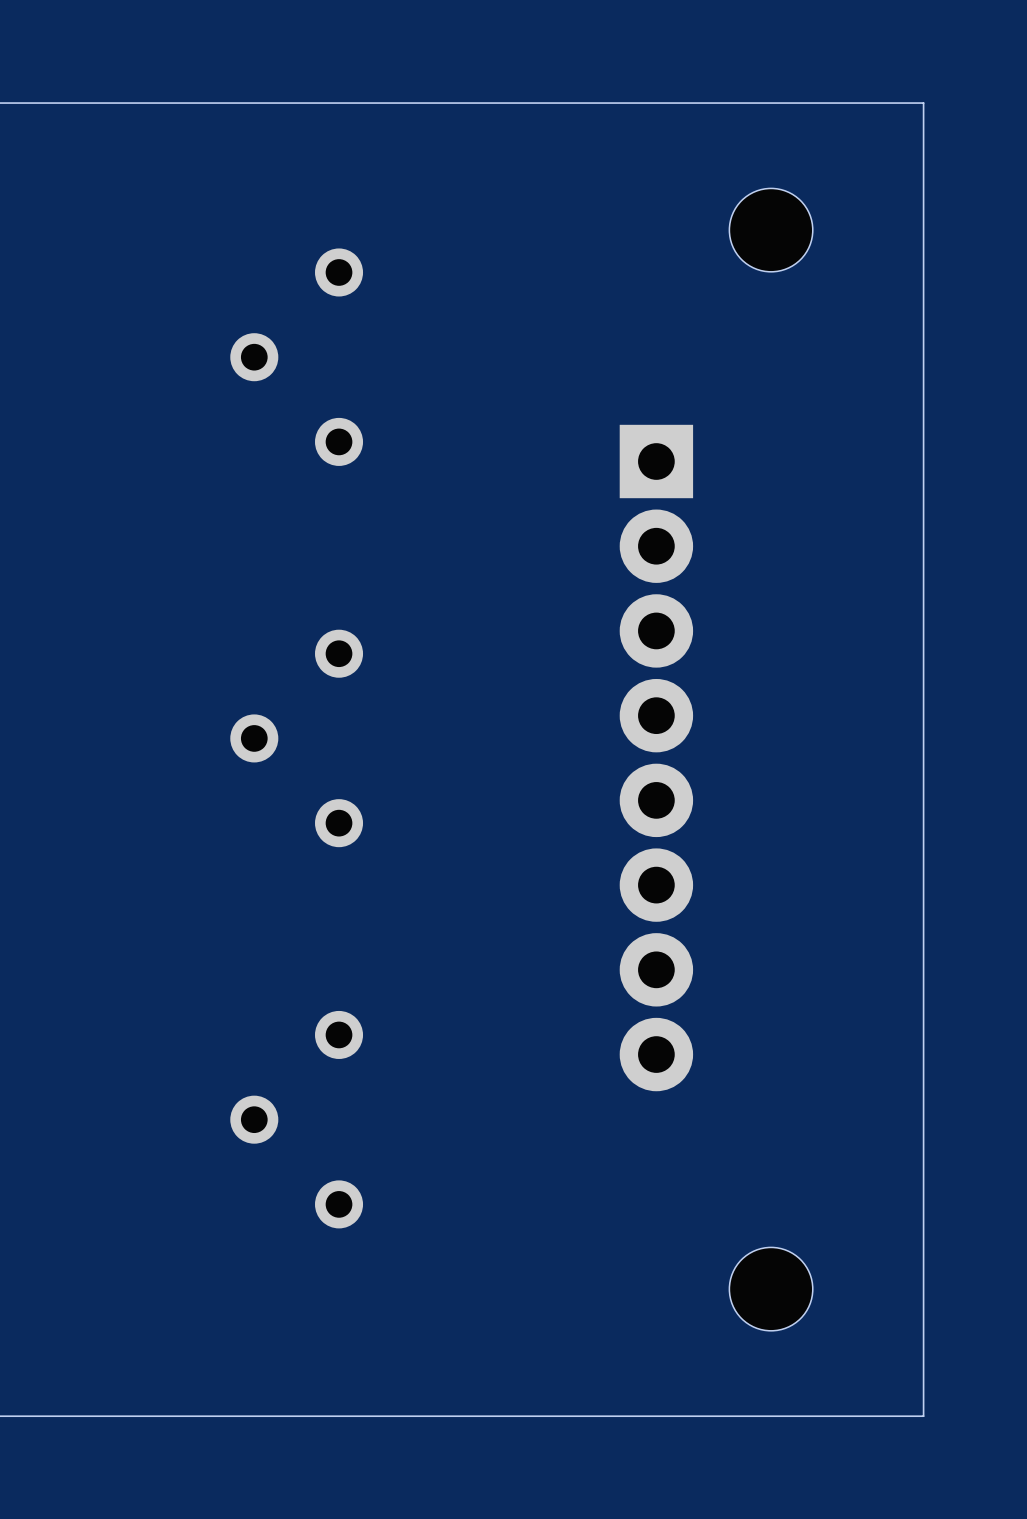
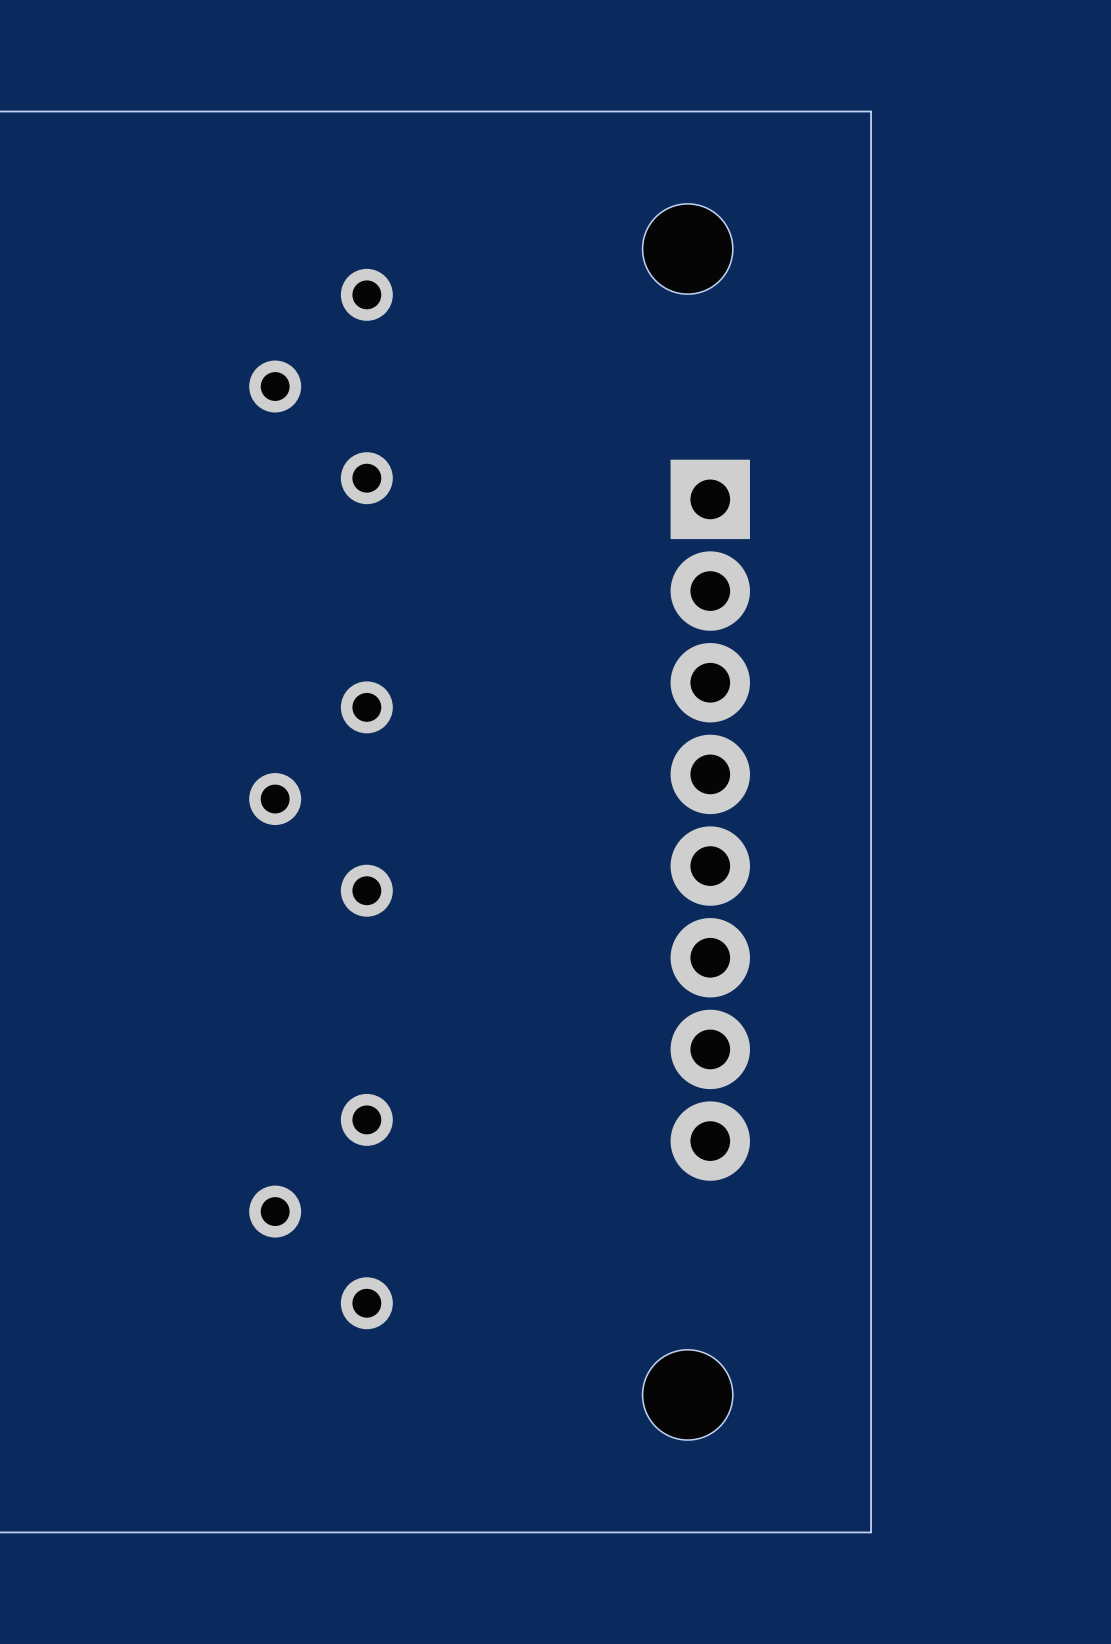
board edge: (804, 103) (923, 103) (923, 1416) (804, 1416) -> (871, 111) (871, 1532)
part position: (771, 230) -> (687, 249)
part position: (771, 1289) -> (687, 1394)

